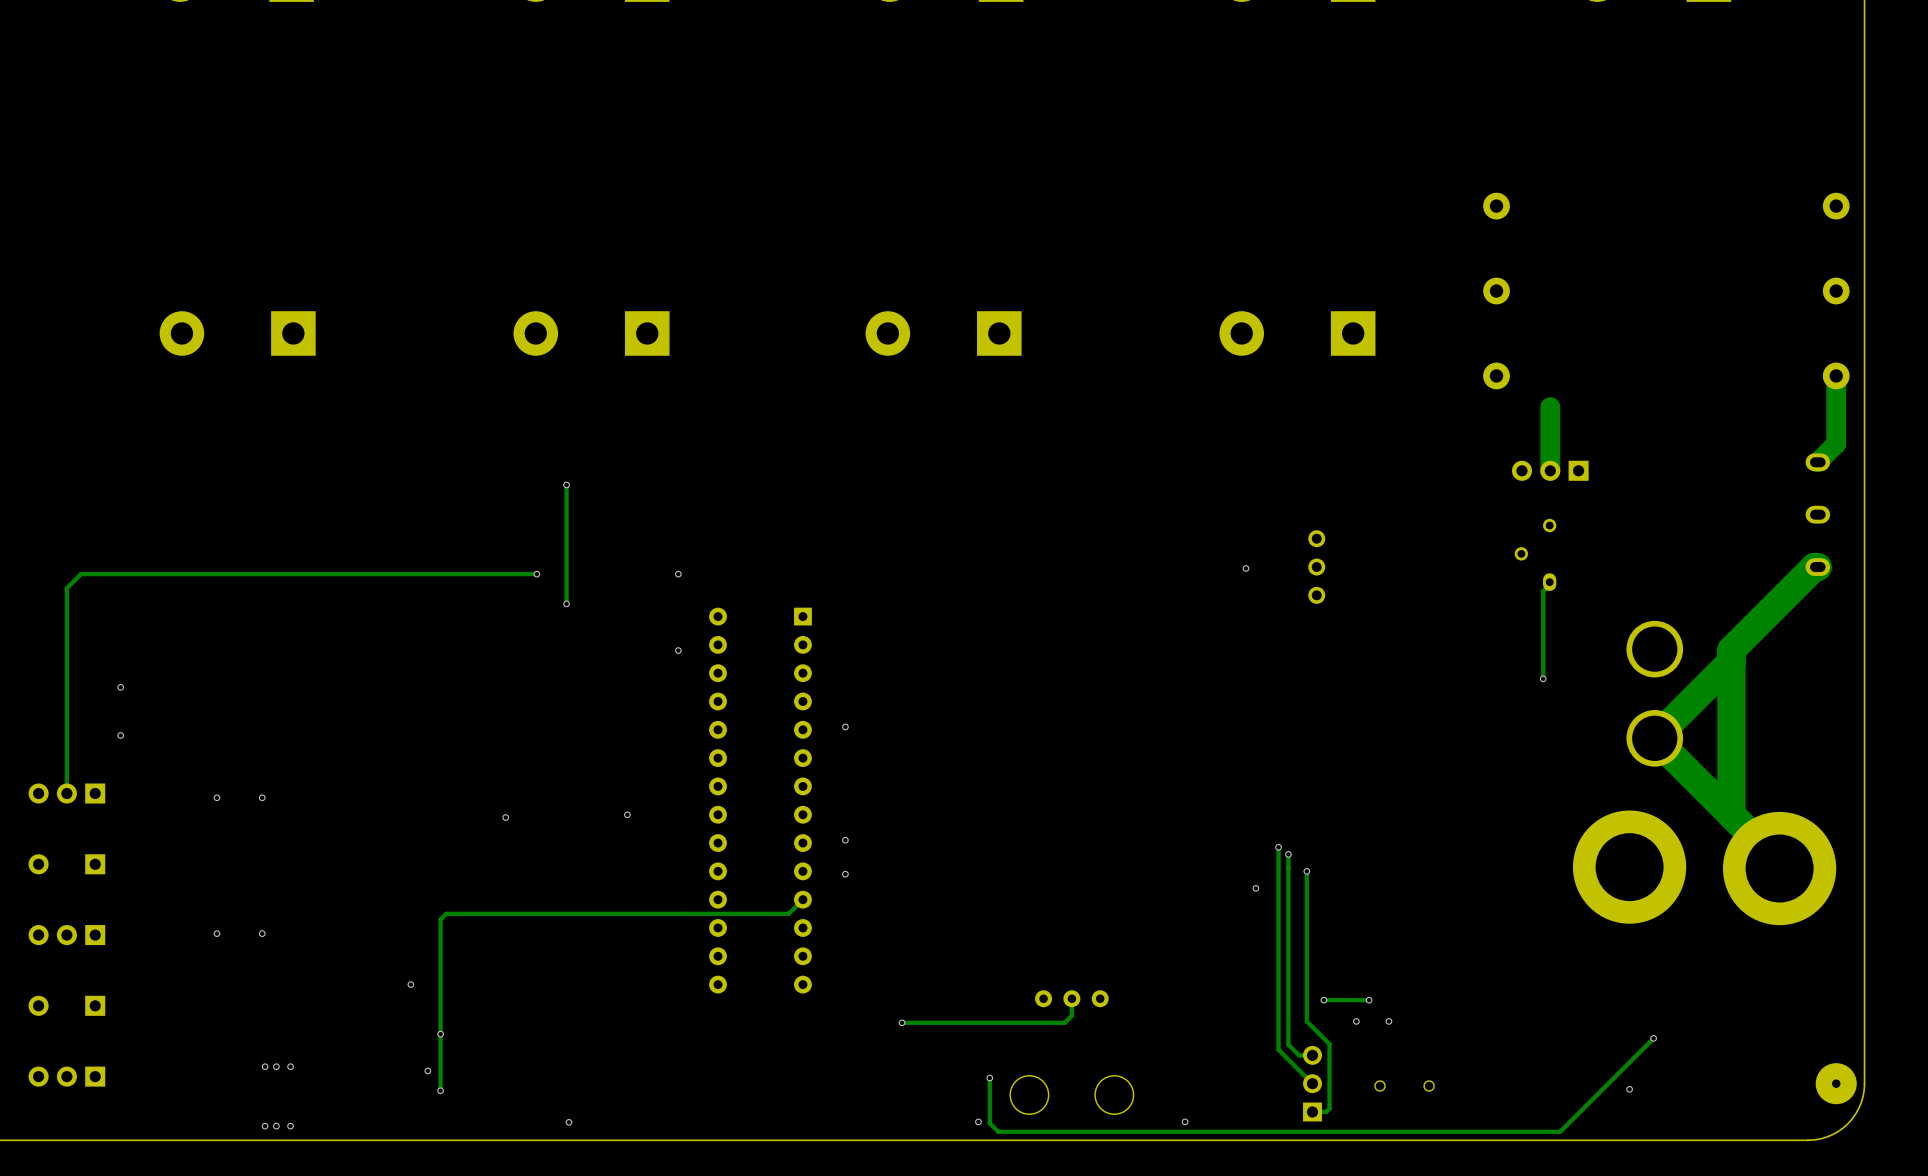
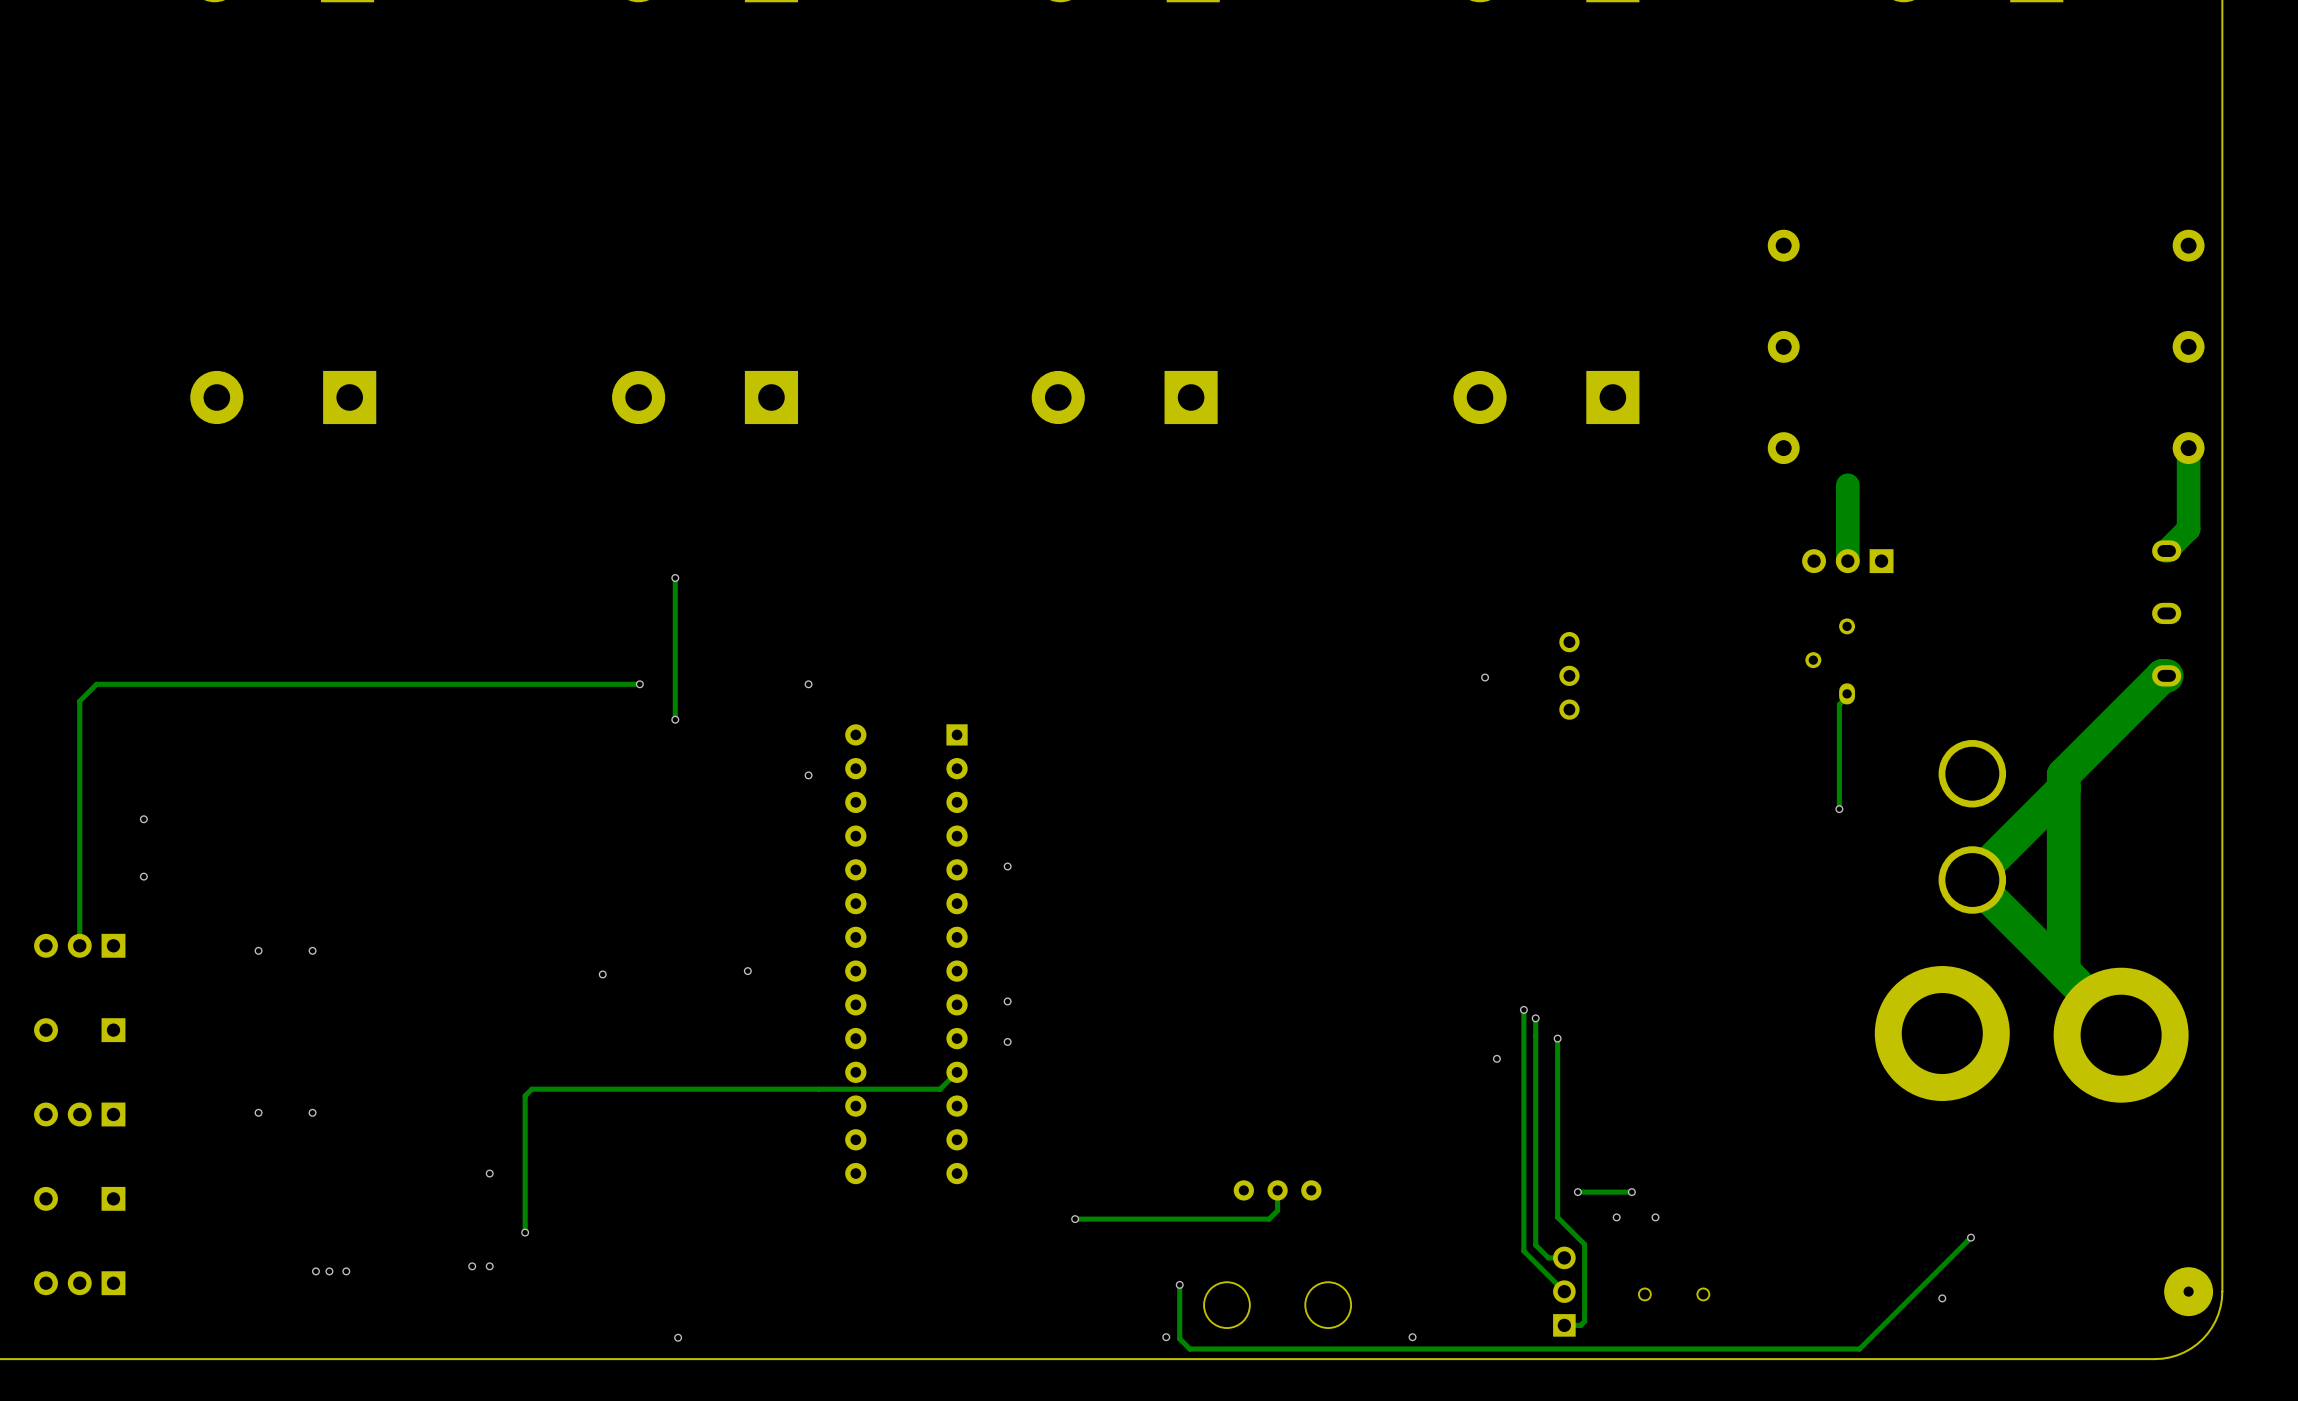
track: (440, 1034) (440, 1090) -> none
via: none -> (472, 1266)
via: none -> (489, 1266)
via: (427, 1070) -> none
via: (440, 1090) -> none
via: (265, 1126) -> none
via: (276, 1126) -> none
via: (290, 1126) -> none

